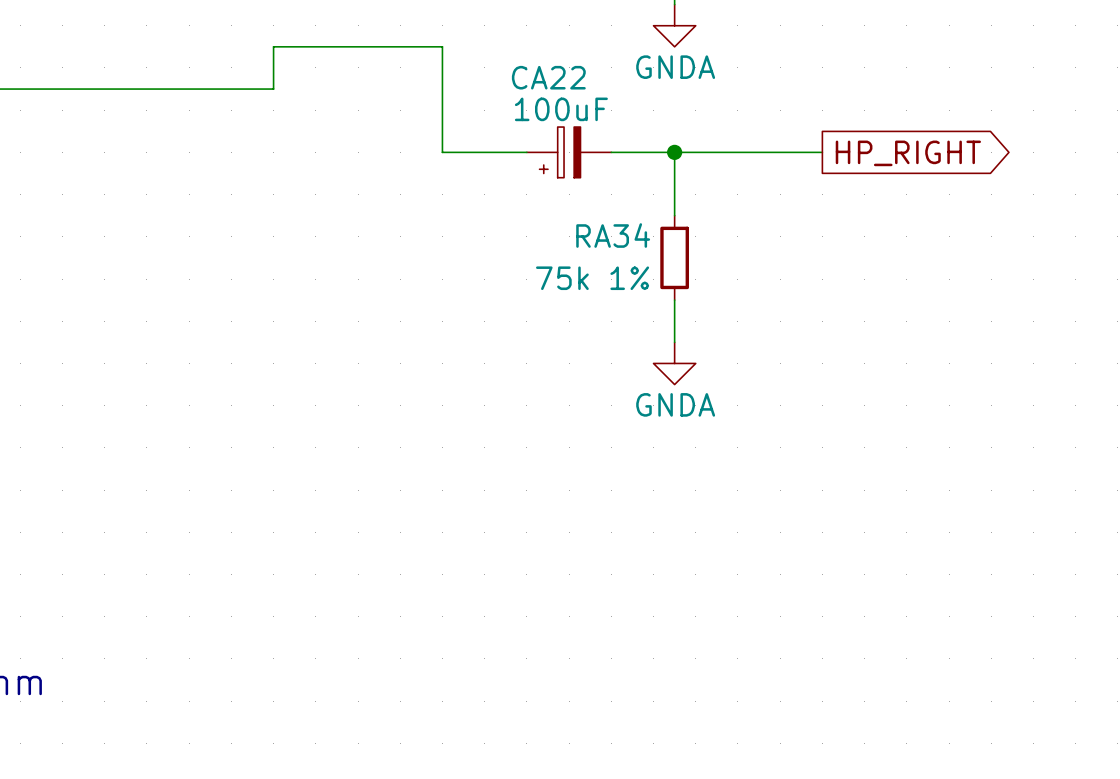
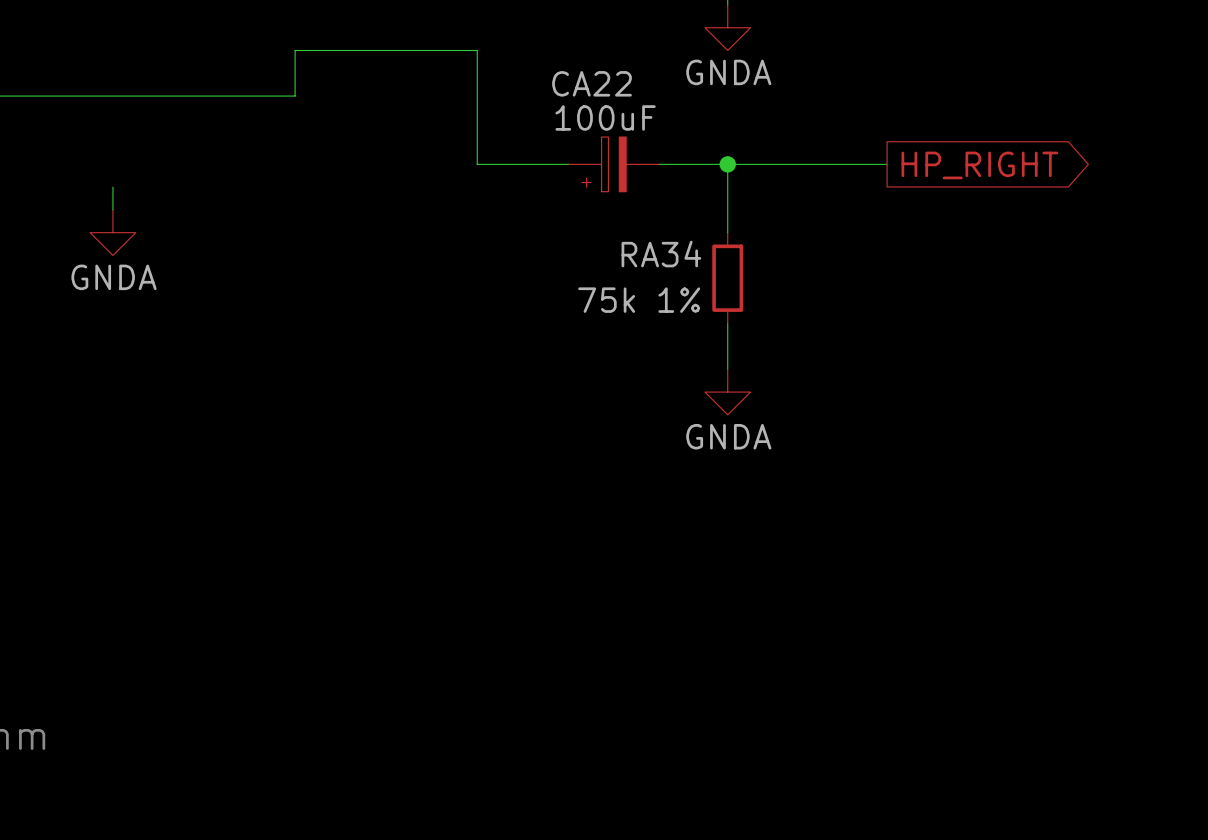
wire: none -> (112, 187) (112, 209)
power symbol: none -> GNDA (112, 232)

